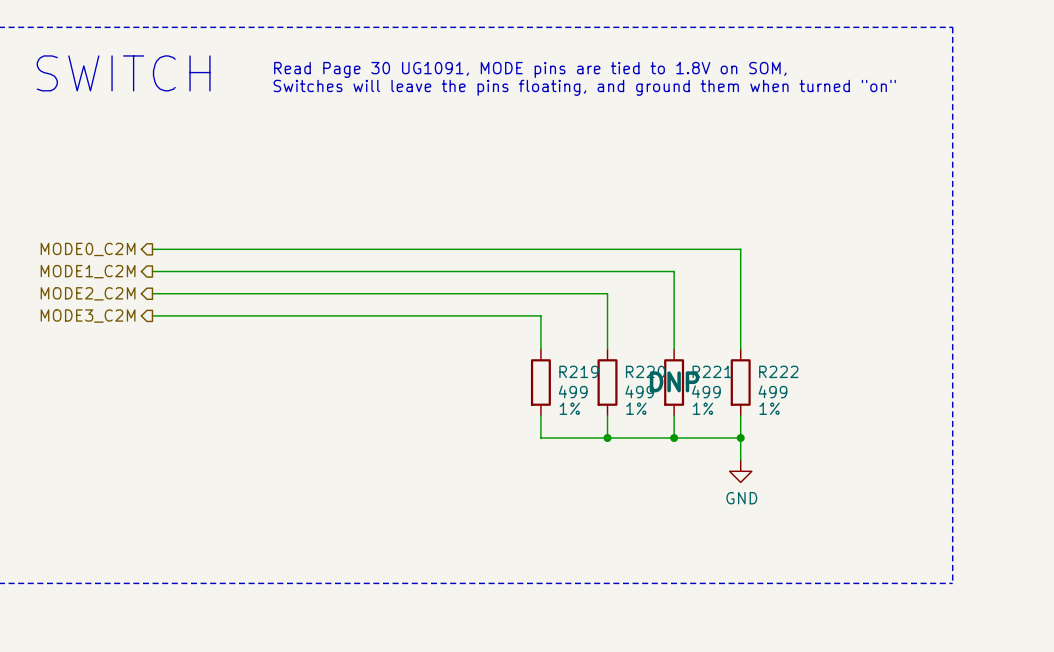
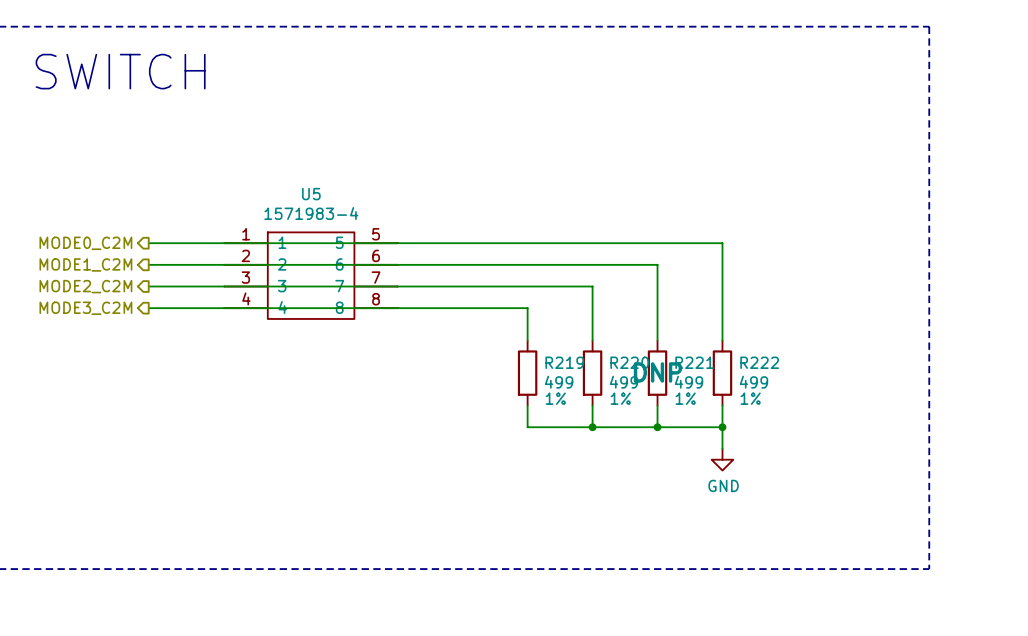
text: Read Page 30 UG1091, MODE pins are tied to 1.8V on SOM, (530, 69) -> none
text: Switches will leave the pins floating, and ground them when turned "on" (584, 87) -> none
U5: none -> 1571983-4 (311, 275)

